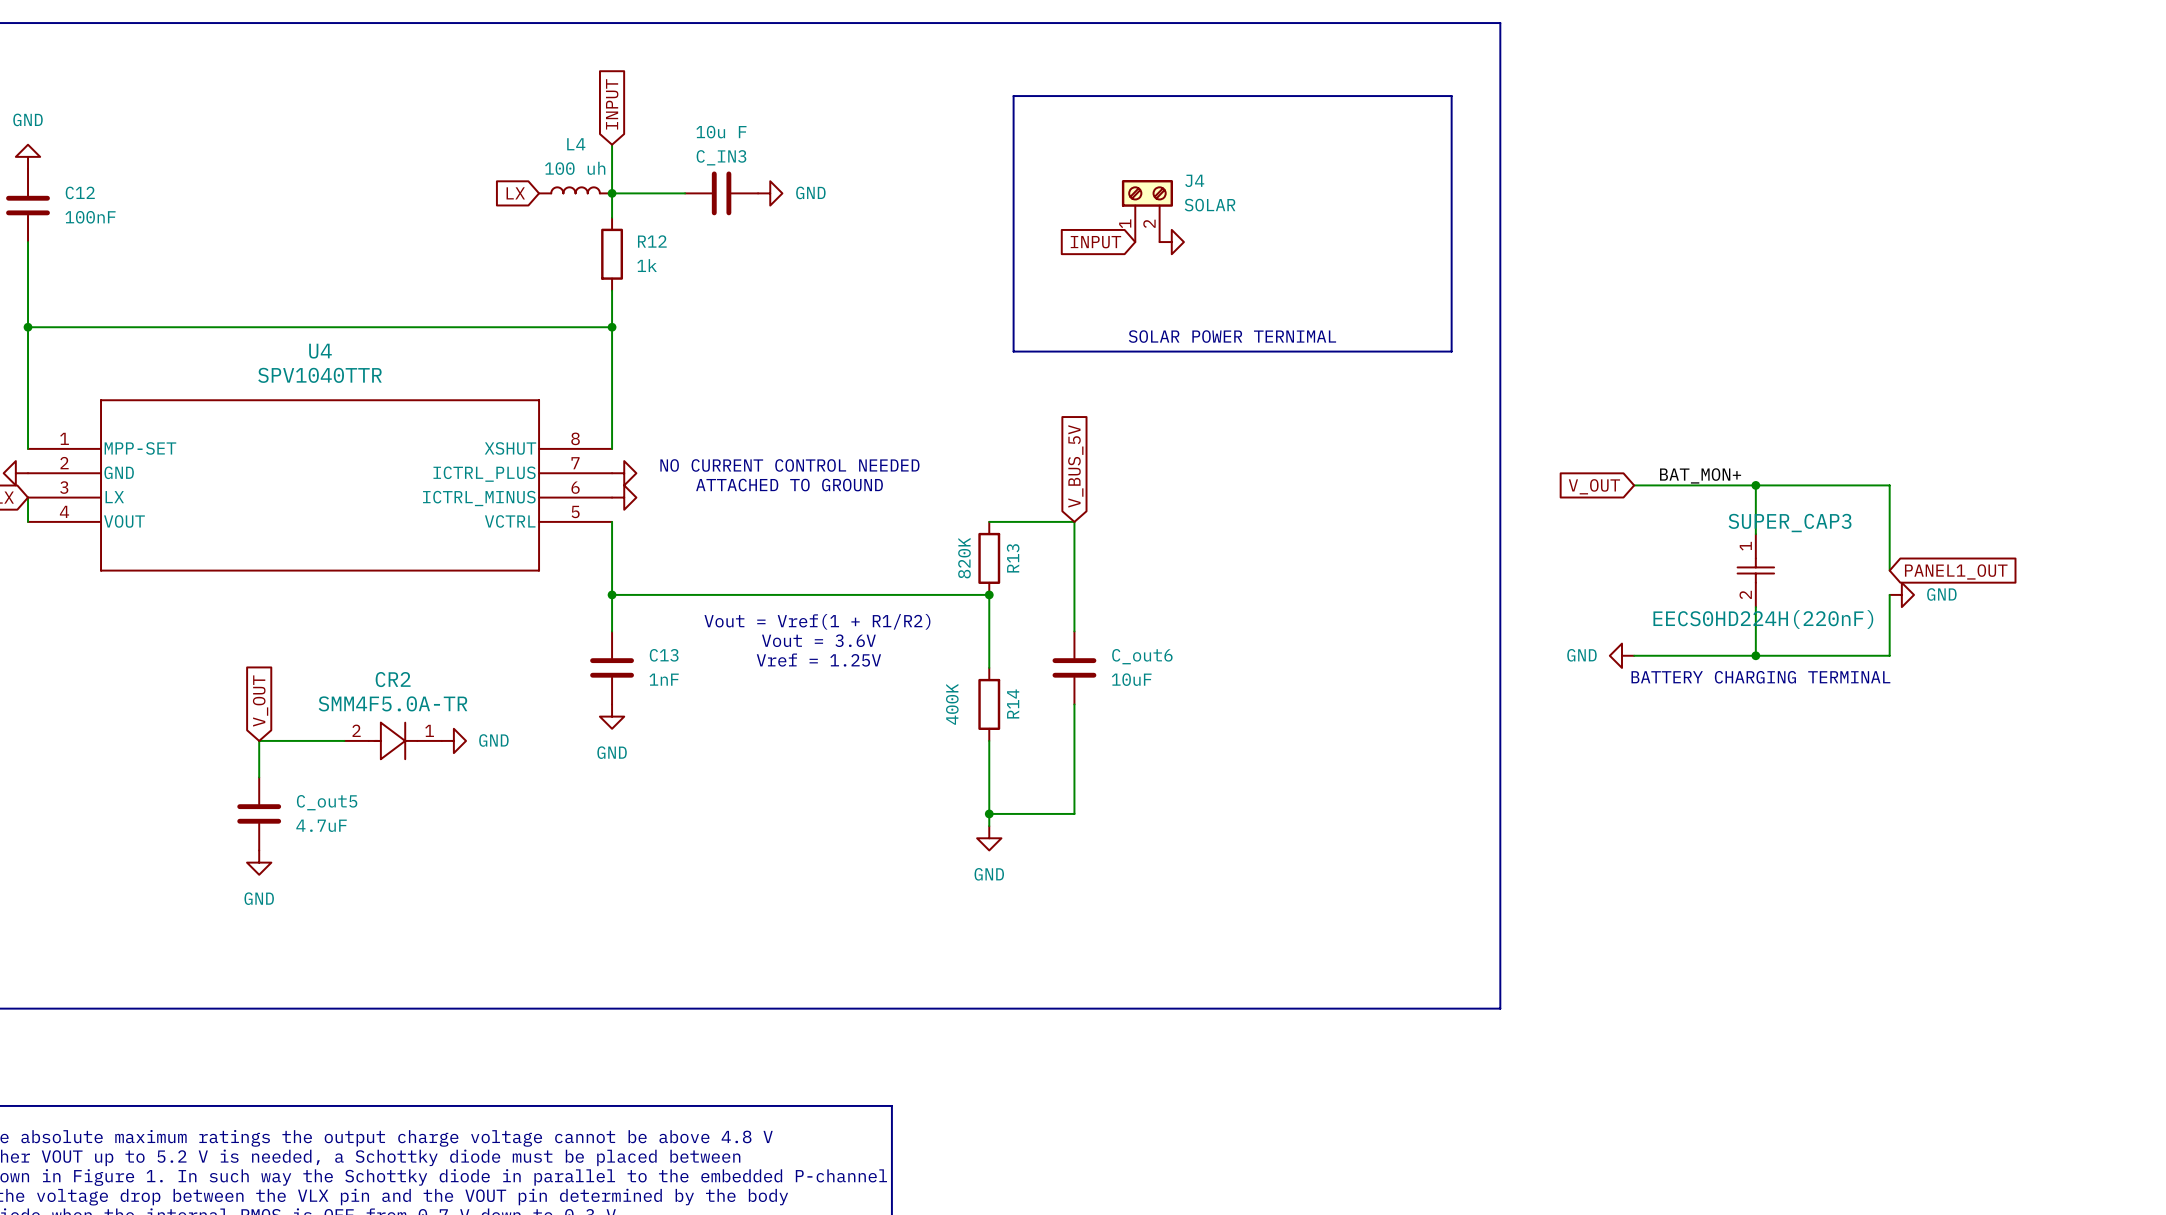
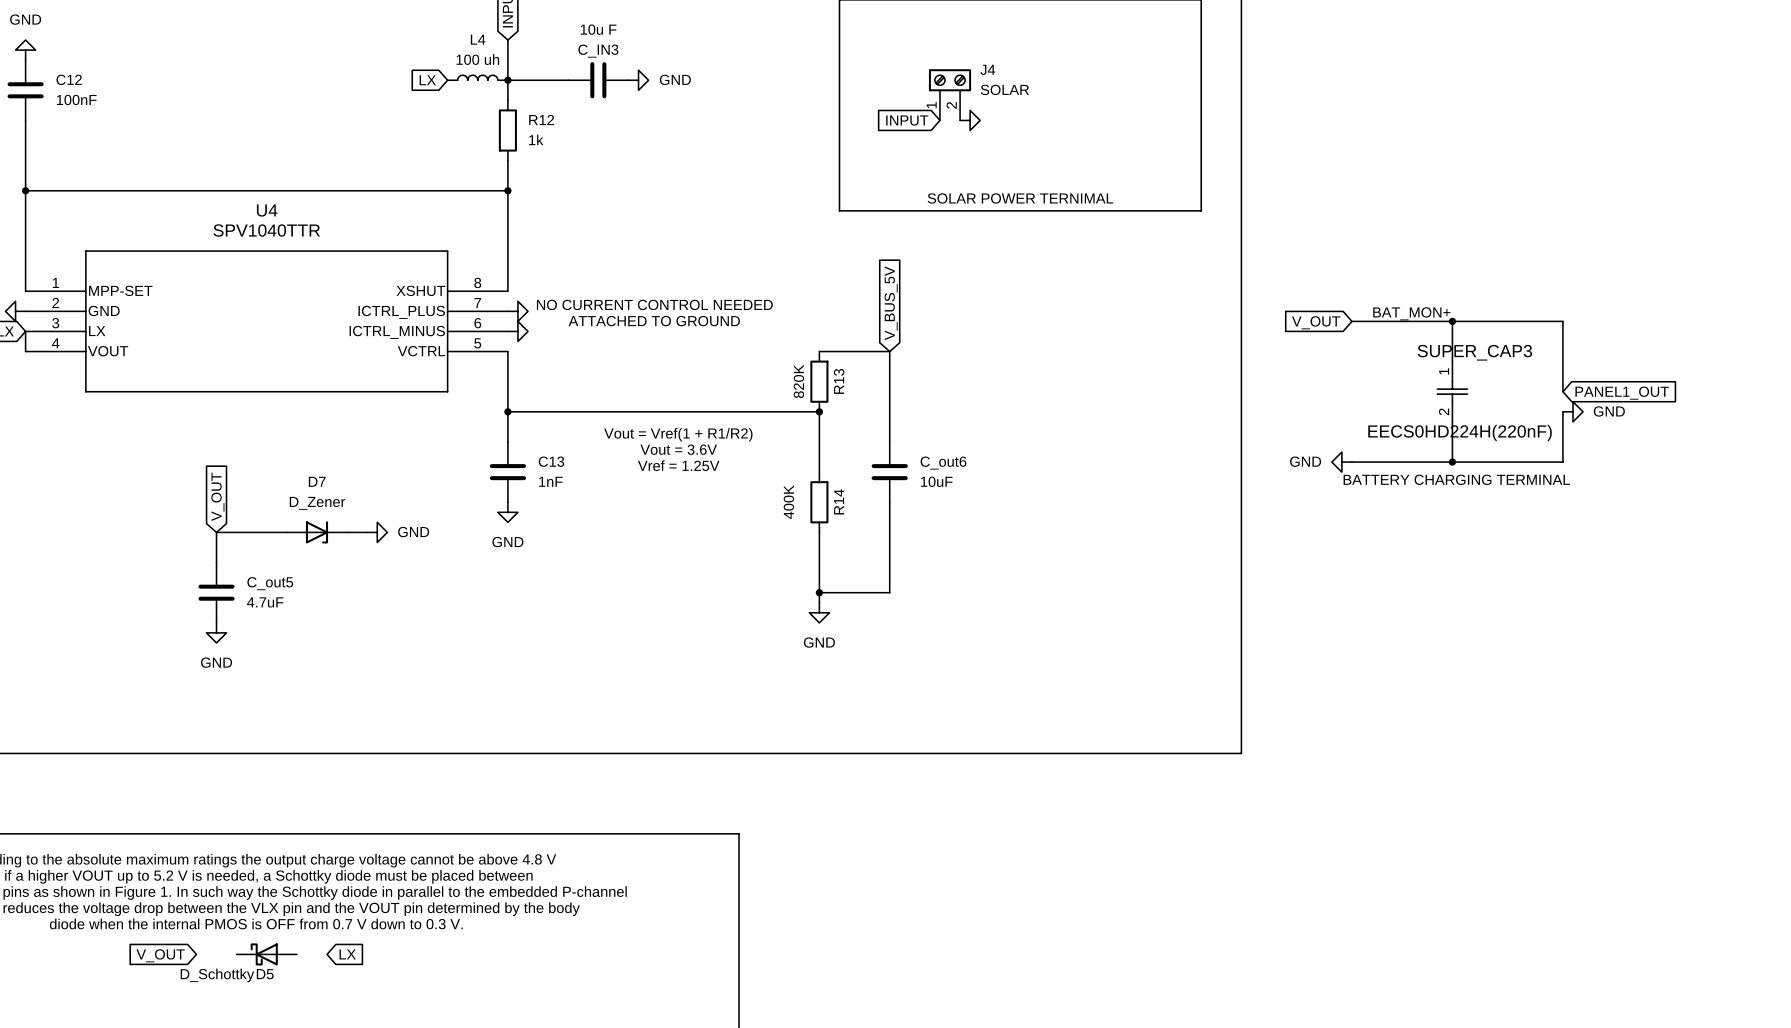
D7: none -> D_Zener (316, 532)
CR2: SMM4F5.0A-TR (393, 740) -> none

